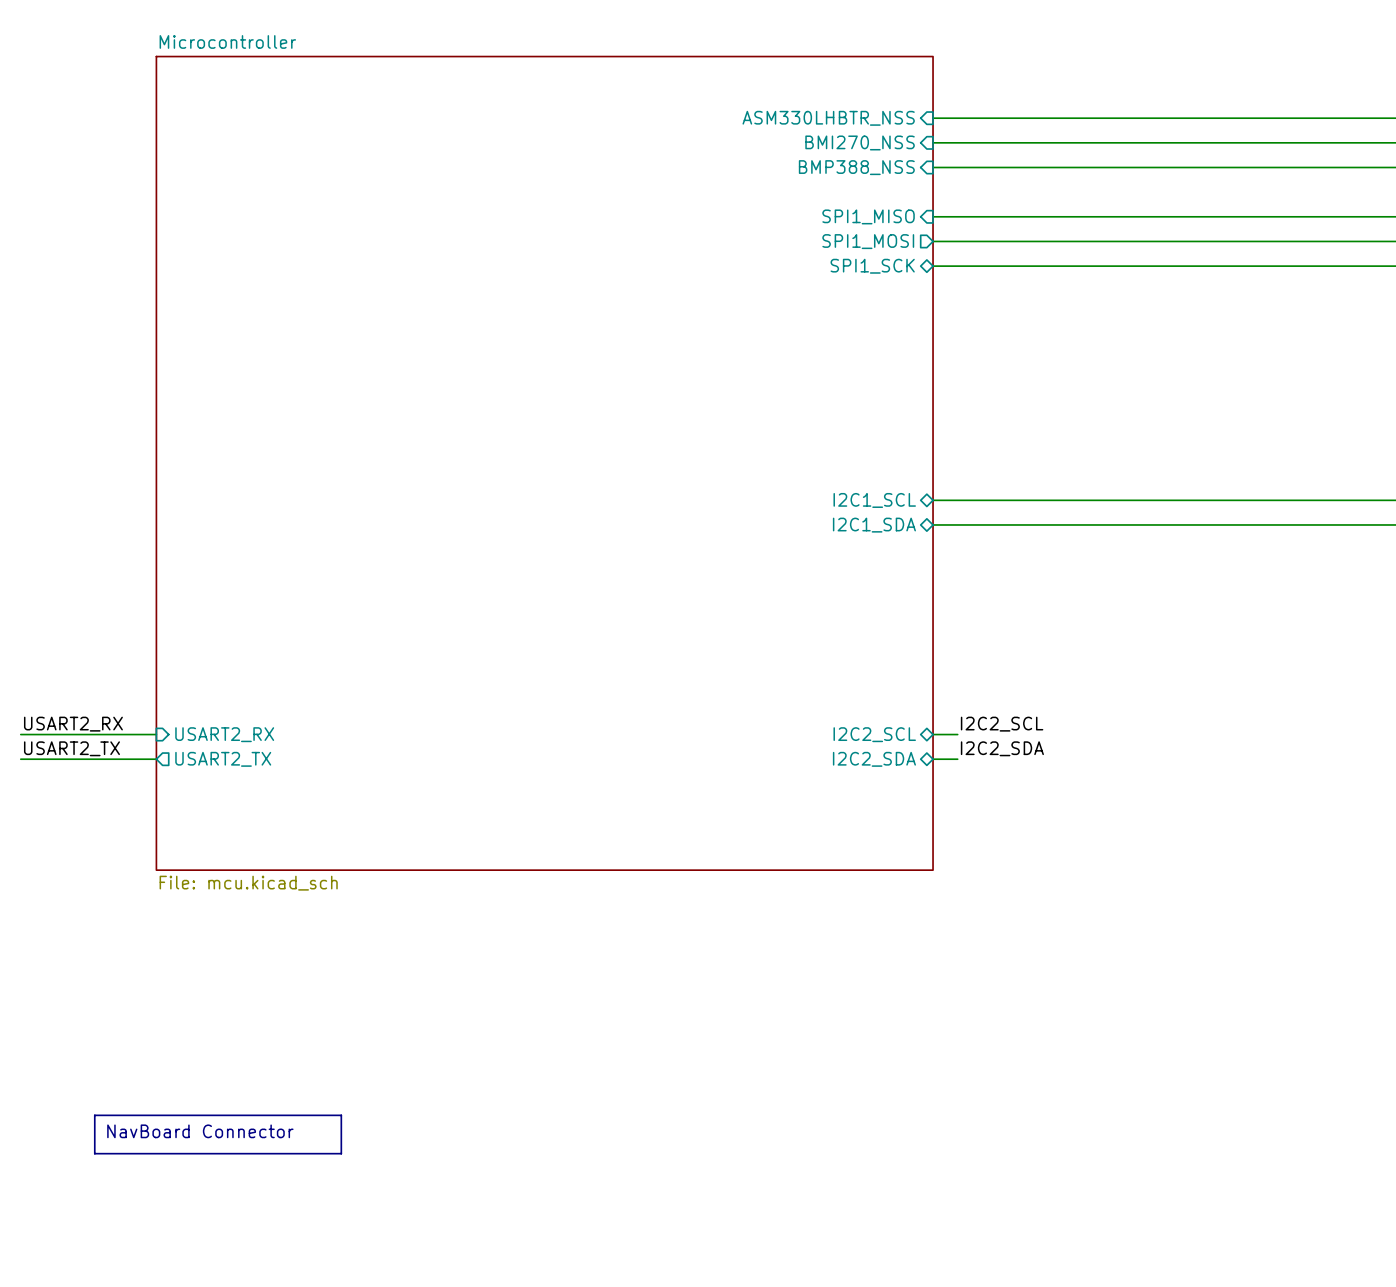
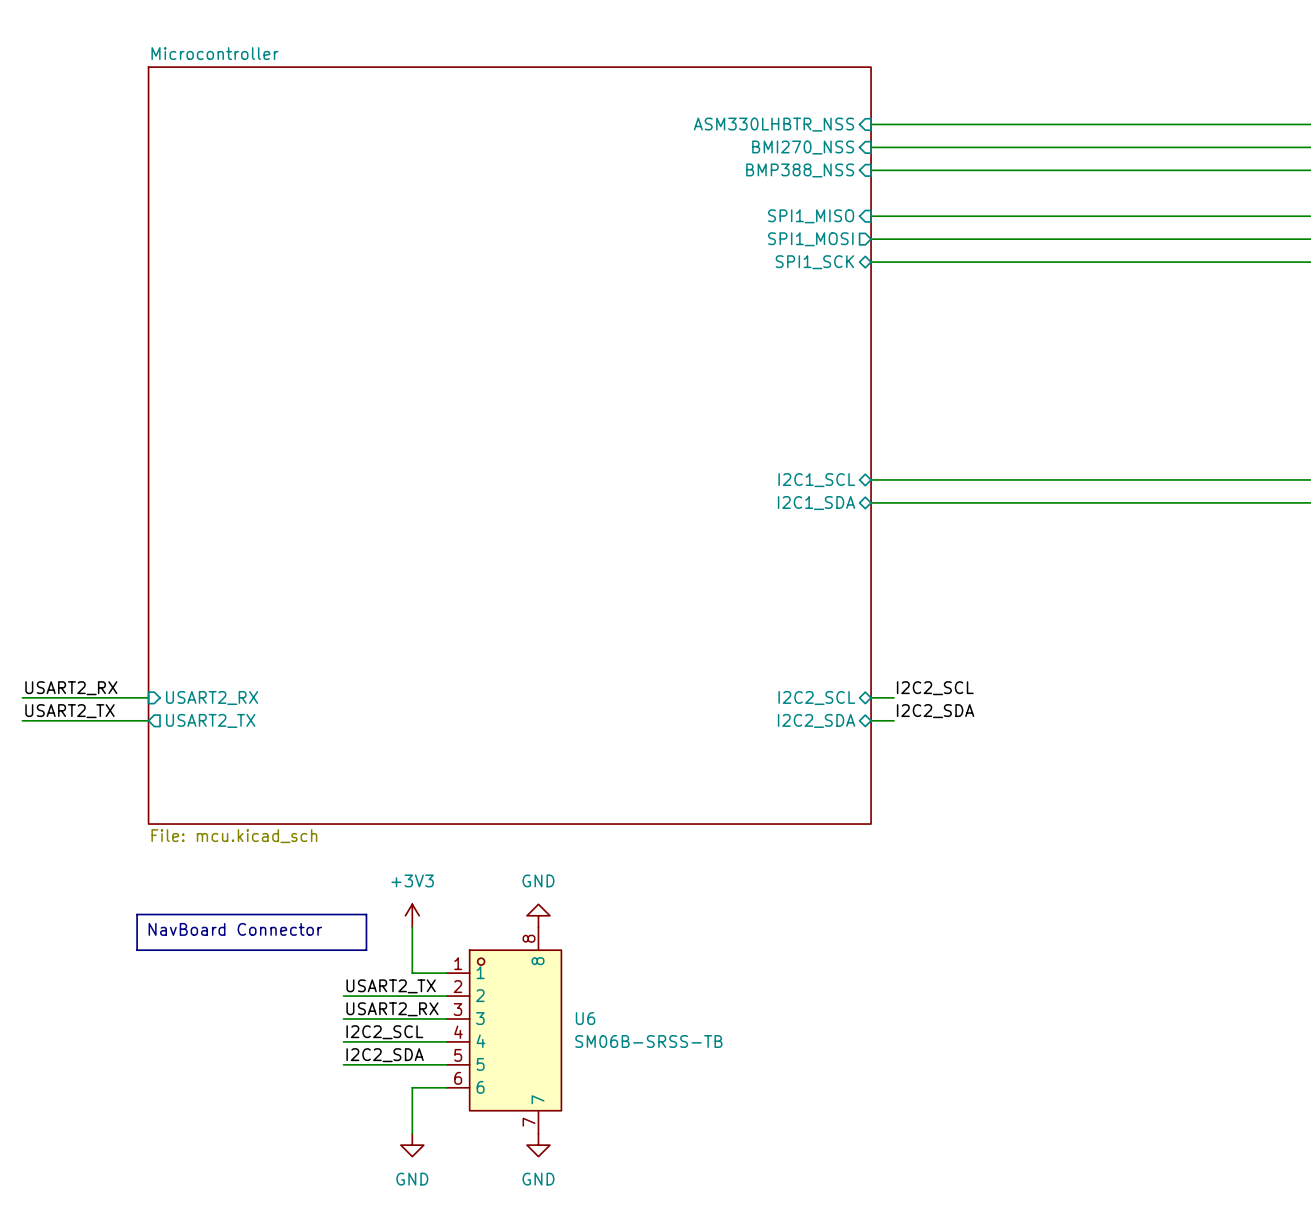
power symbol: none -> +3V3 (412, 915)
power symbol: none -> GND (538, 915)
wire: none -> (412, 927) (412, 973) (446, 973)
label: none -> USART2_TX (391, 986)
wire: none -> (343, 996) (446, 996)
label: none -> USART2_RX (392, 1009)
wire: none -> (343, 1018) (446, 1018)
U6: none -> SM06B-SRSS-TB (504, 1030)
label: none -> I2C2_SCL (384, 1032)
wire: none -> (343, 1041) (446, 1041)
line: (94, 1115) (341, 1115) (341, 1153) (94, 1153) (94, 1115) -> (137, 914) (366, 914) (366, 950) (137, 950) (137, 914)
label: none -> I2C2_SDA (385, 1055)
wire: none -> (343, 1064) (446, 1064)
text position: NavBoard Connector (200, 1131) -> NavBoard Connector (235, 929)
wire: none -> (446, 1087) (412, 1087) (412, 1133)
power symbol: none -> GND (412, 1145)
power symbol: none -> GND (538, 1145)

